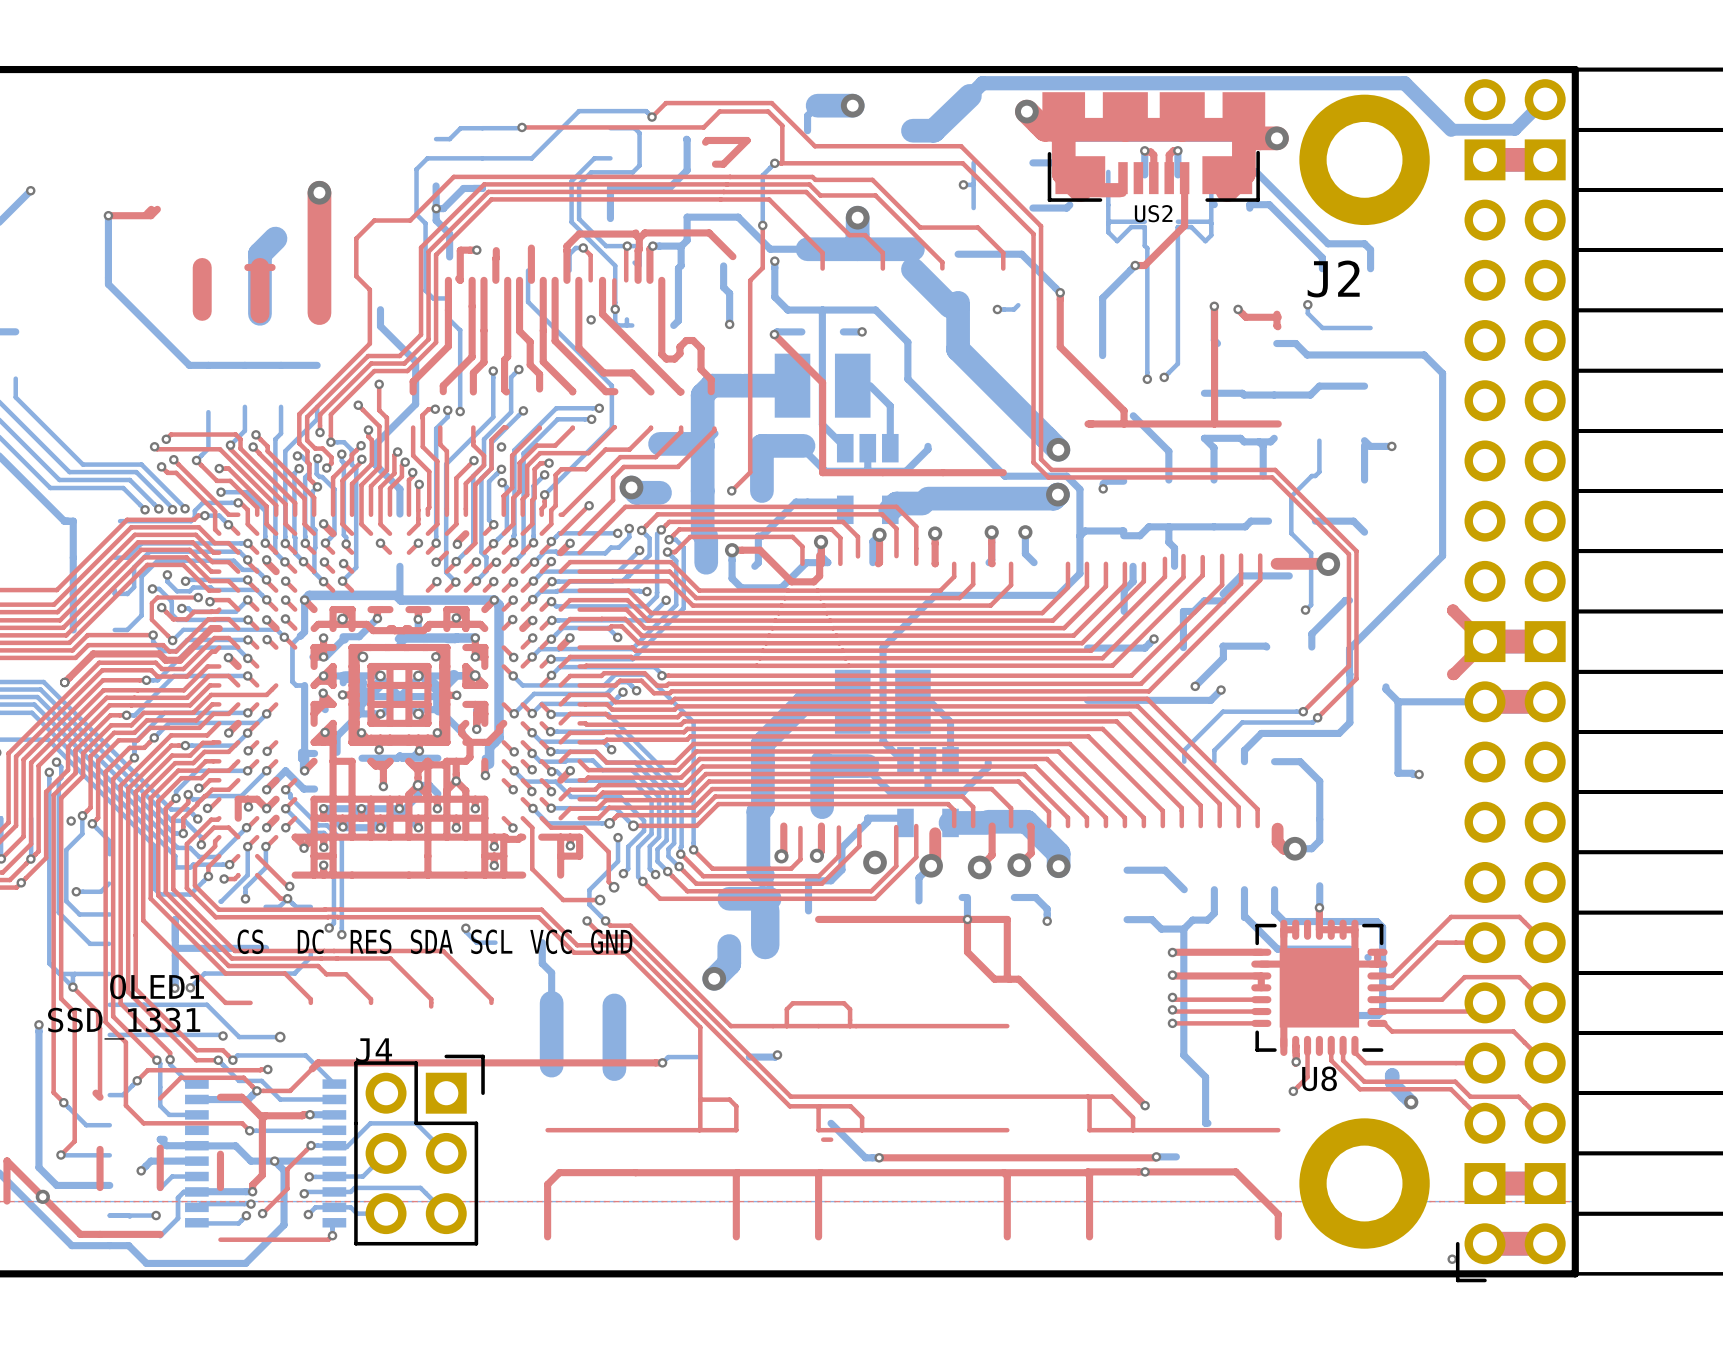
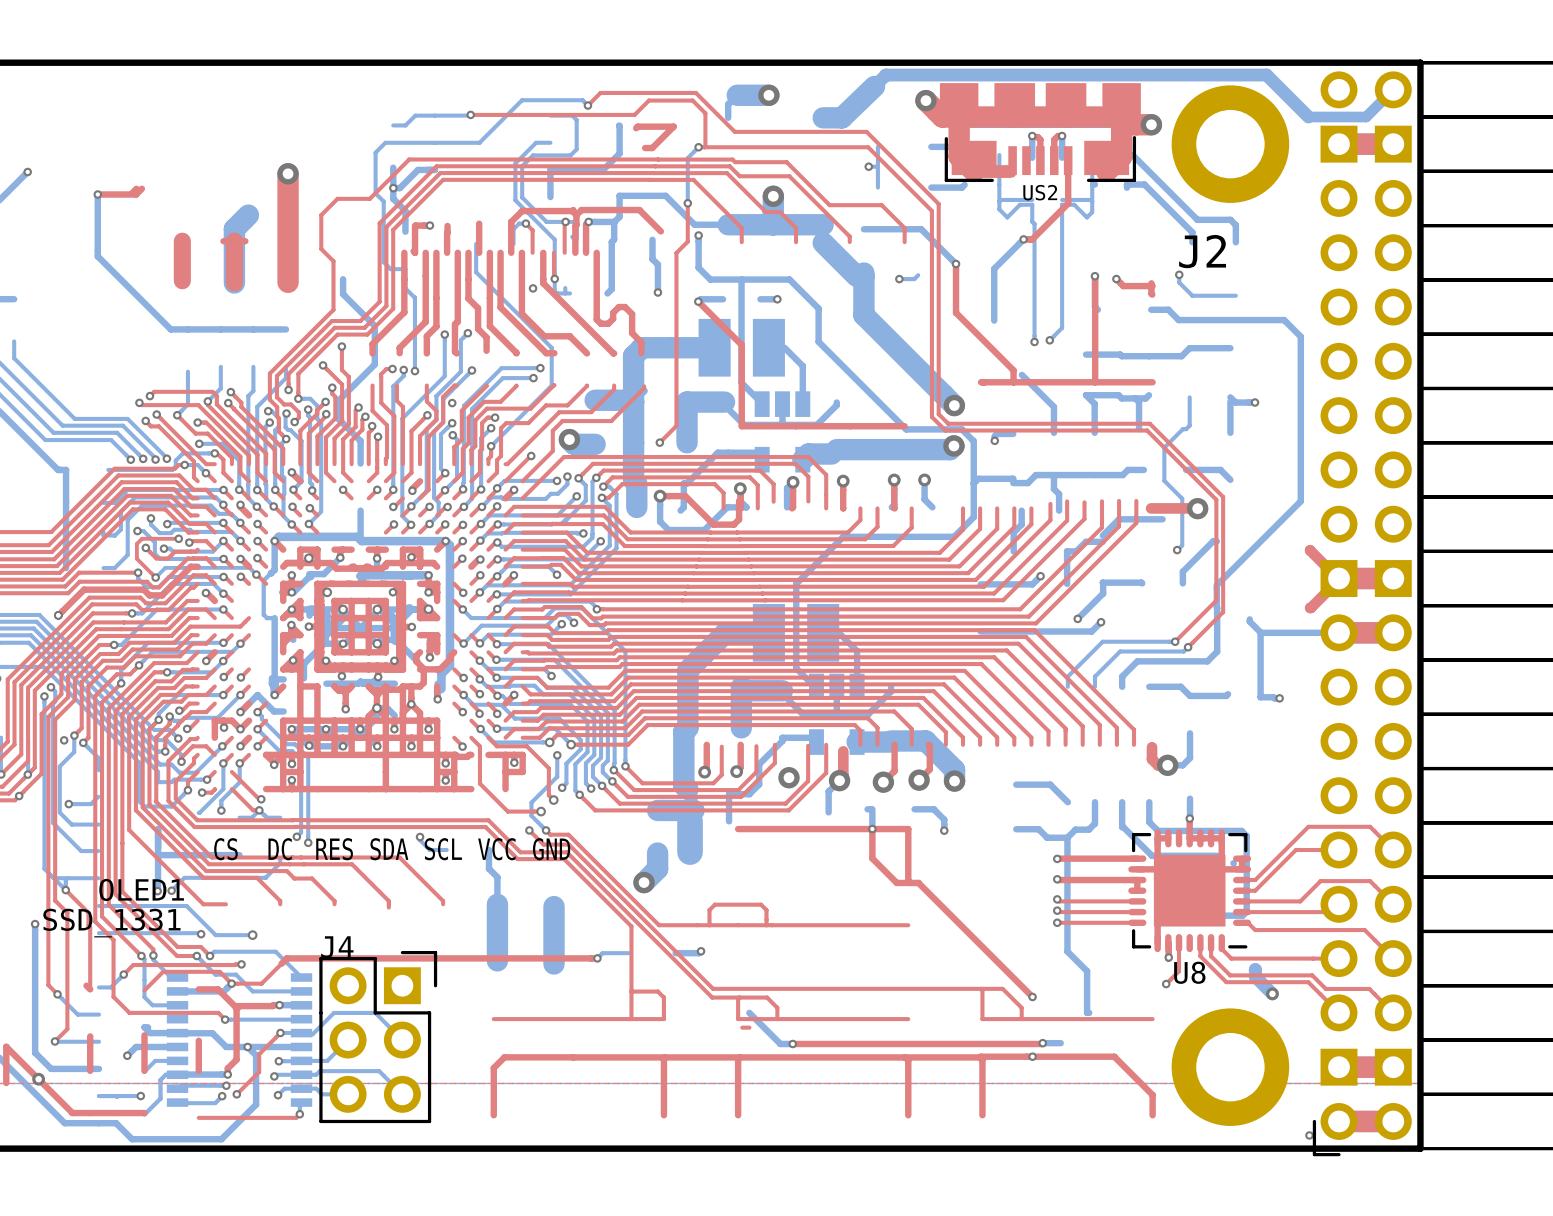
bottom track: (1300, 761) (1319, 781) (1319, 813) -> (1172, 686) (1180, 686) (1190, 695) (1226, 695) (1228, 694)

